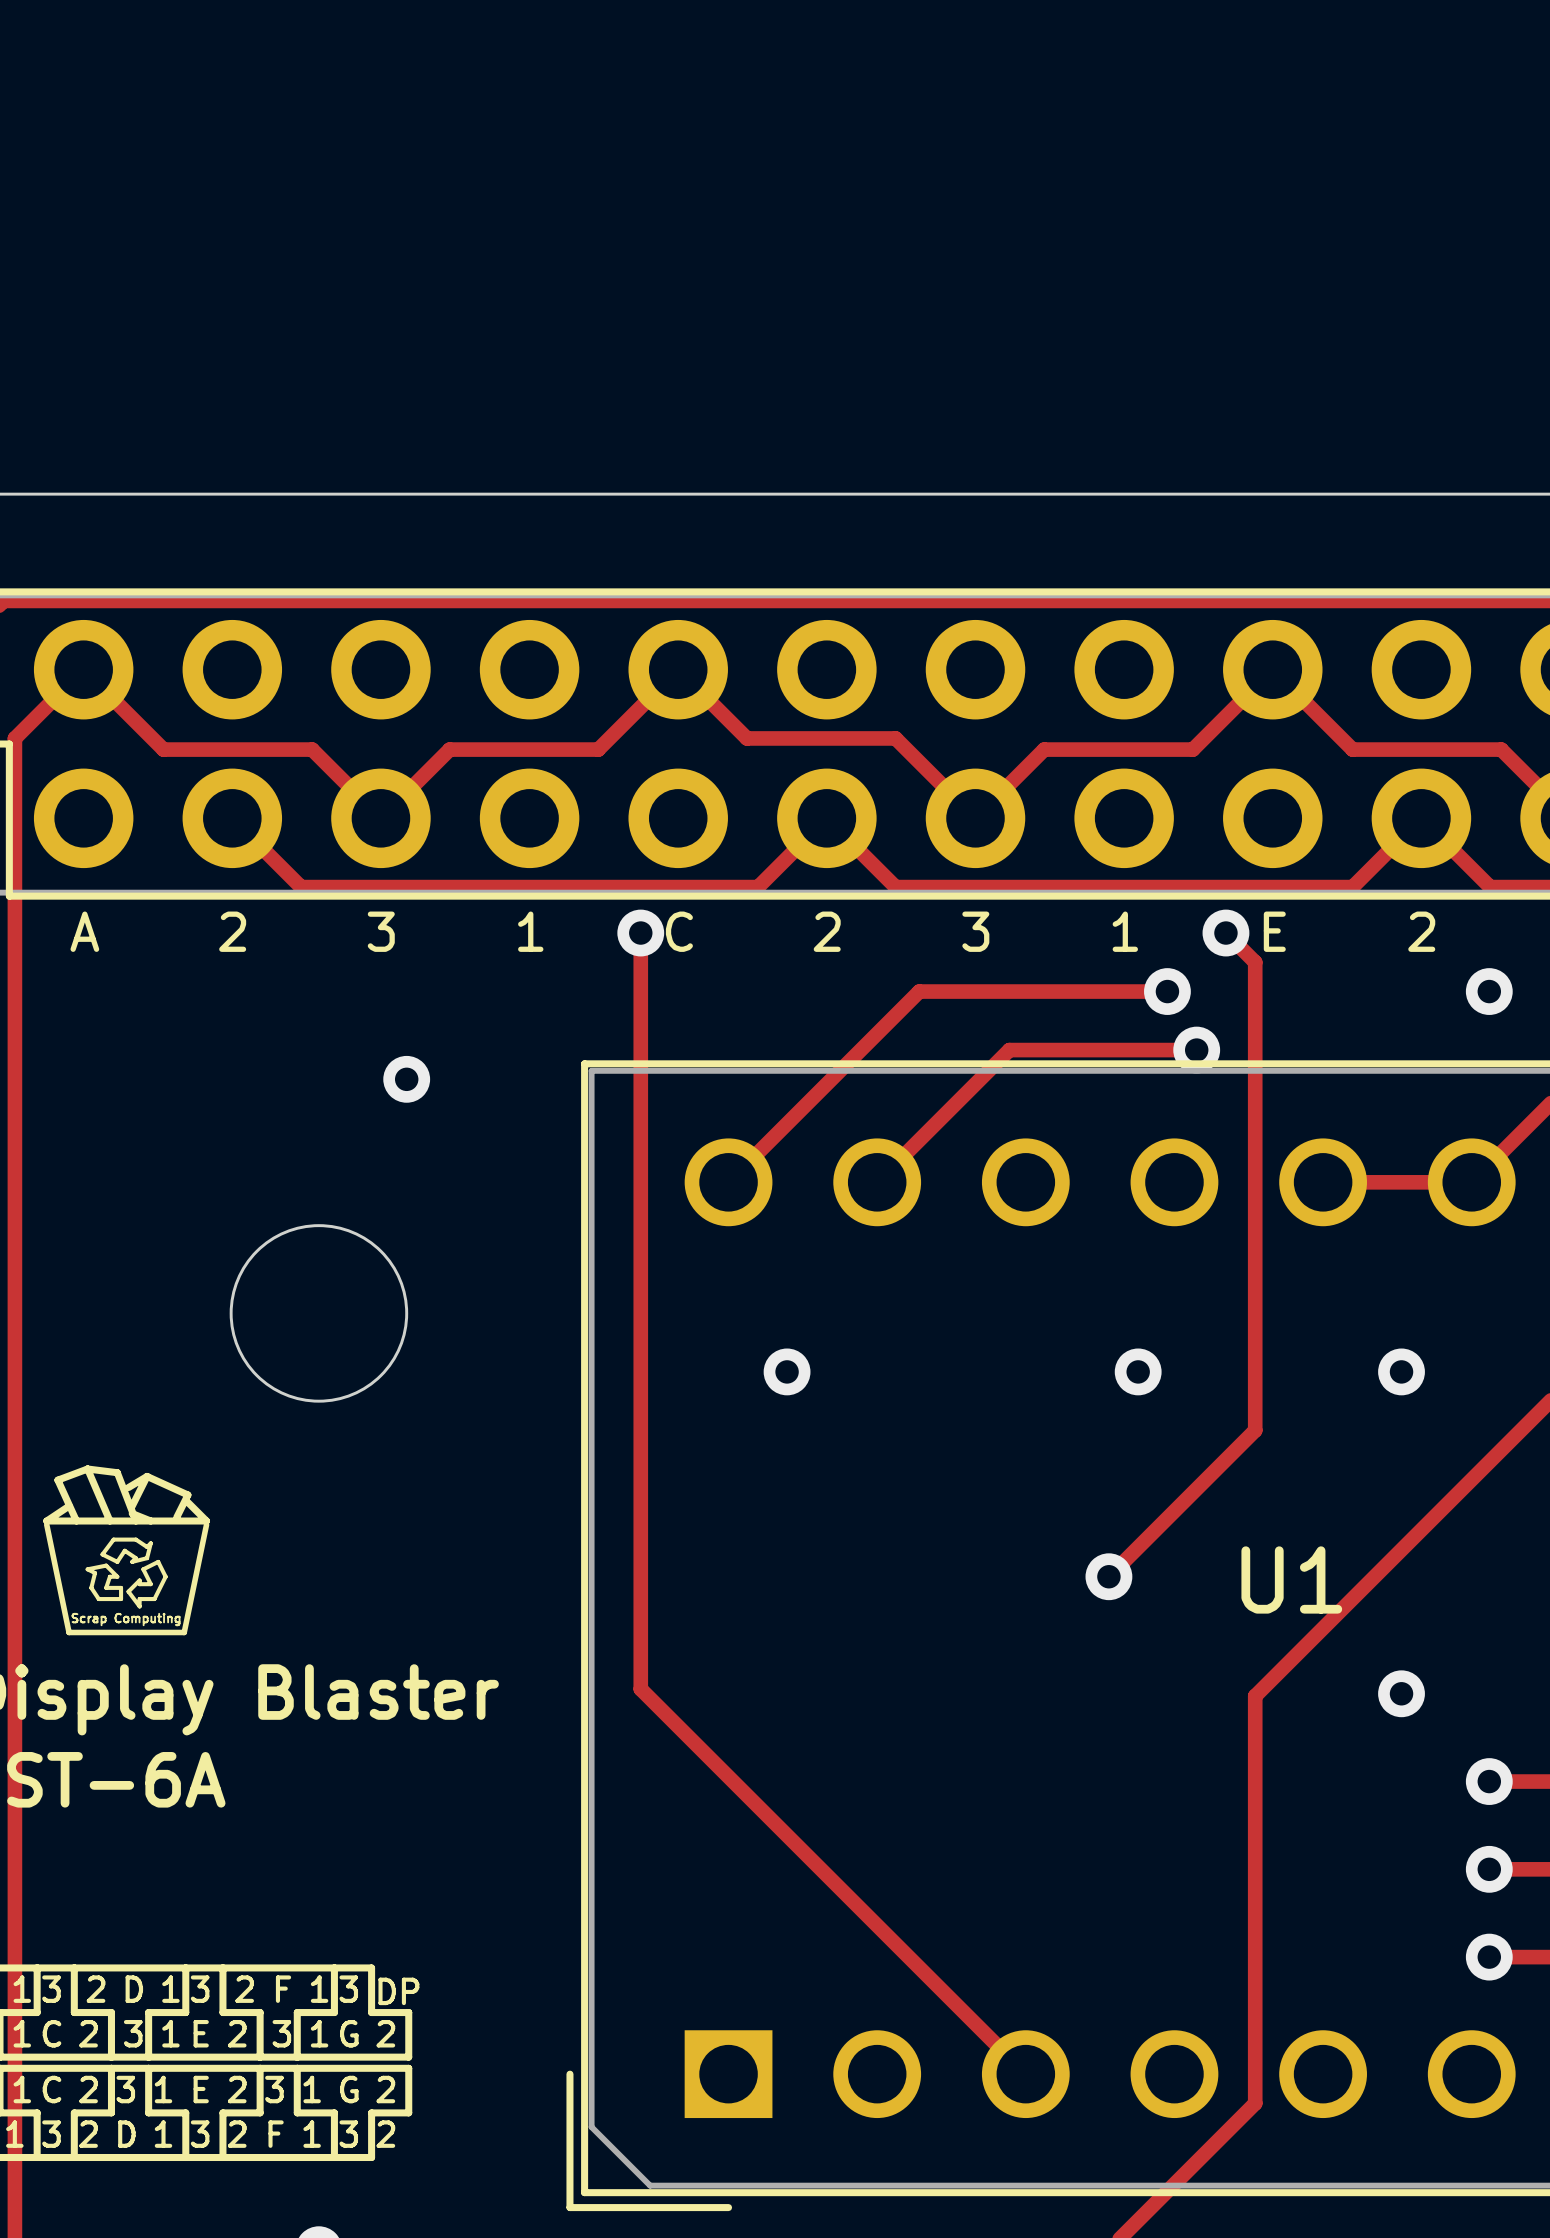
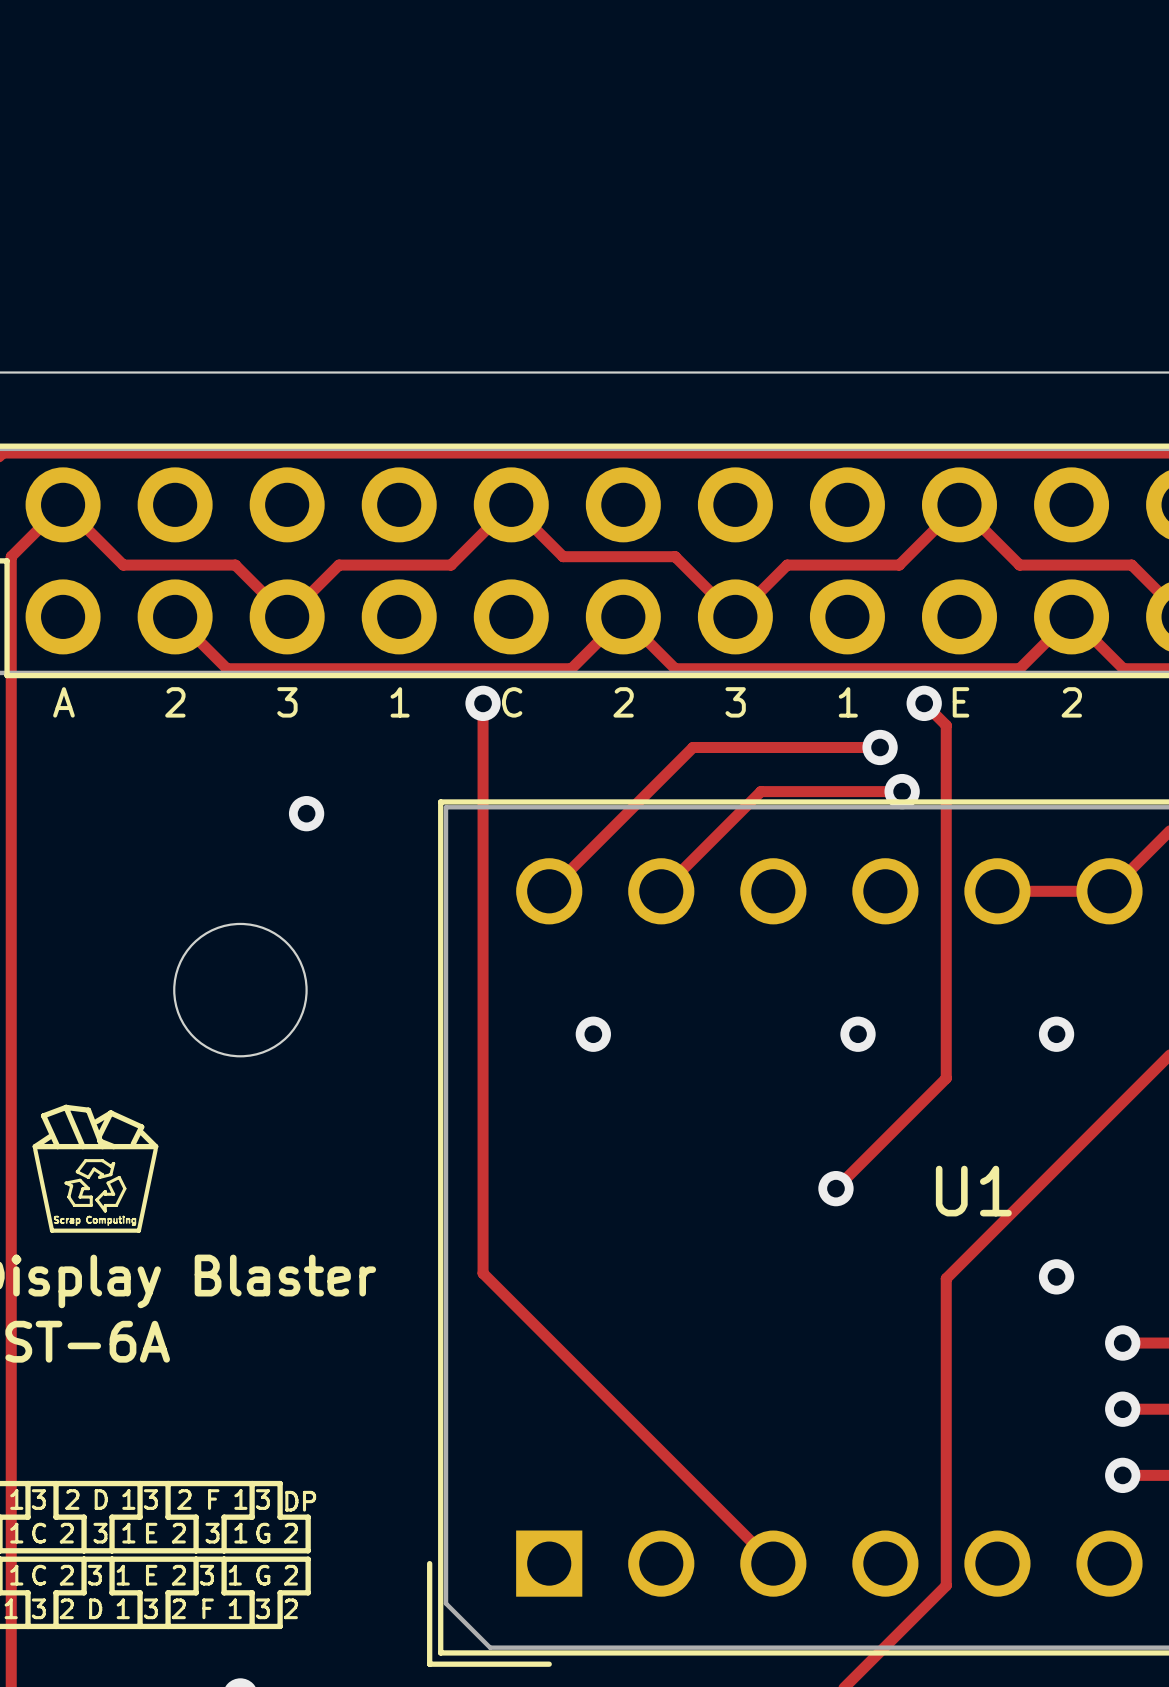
via: (1489, 991) -> none

